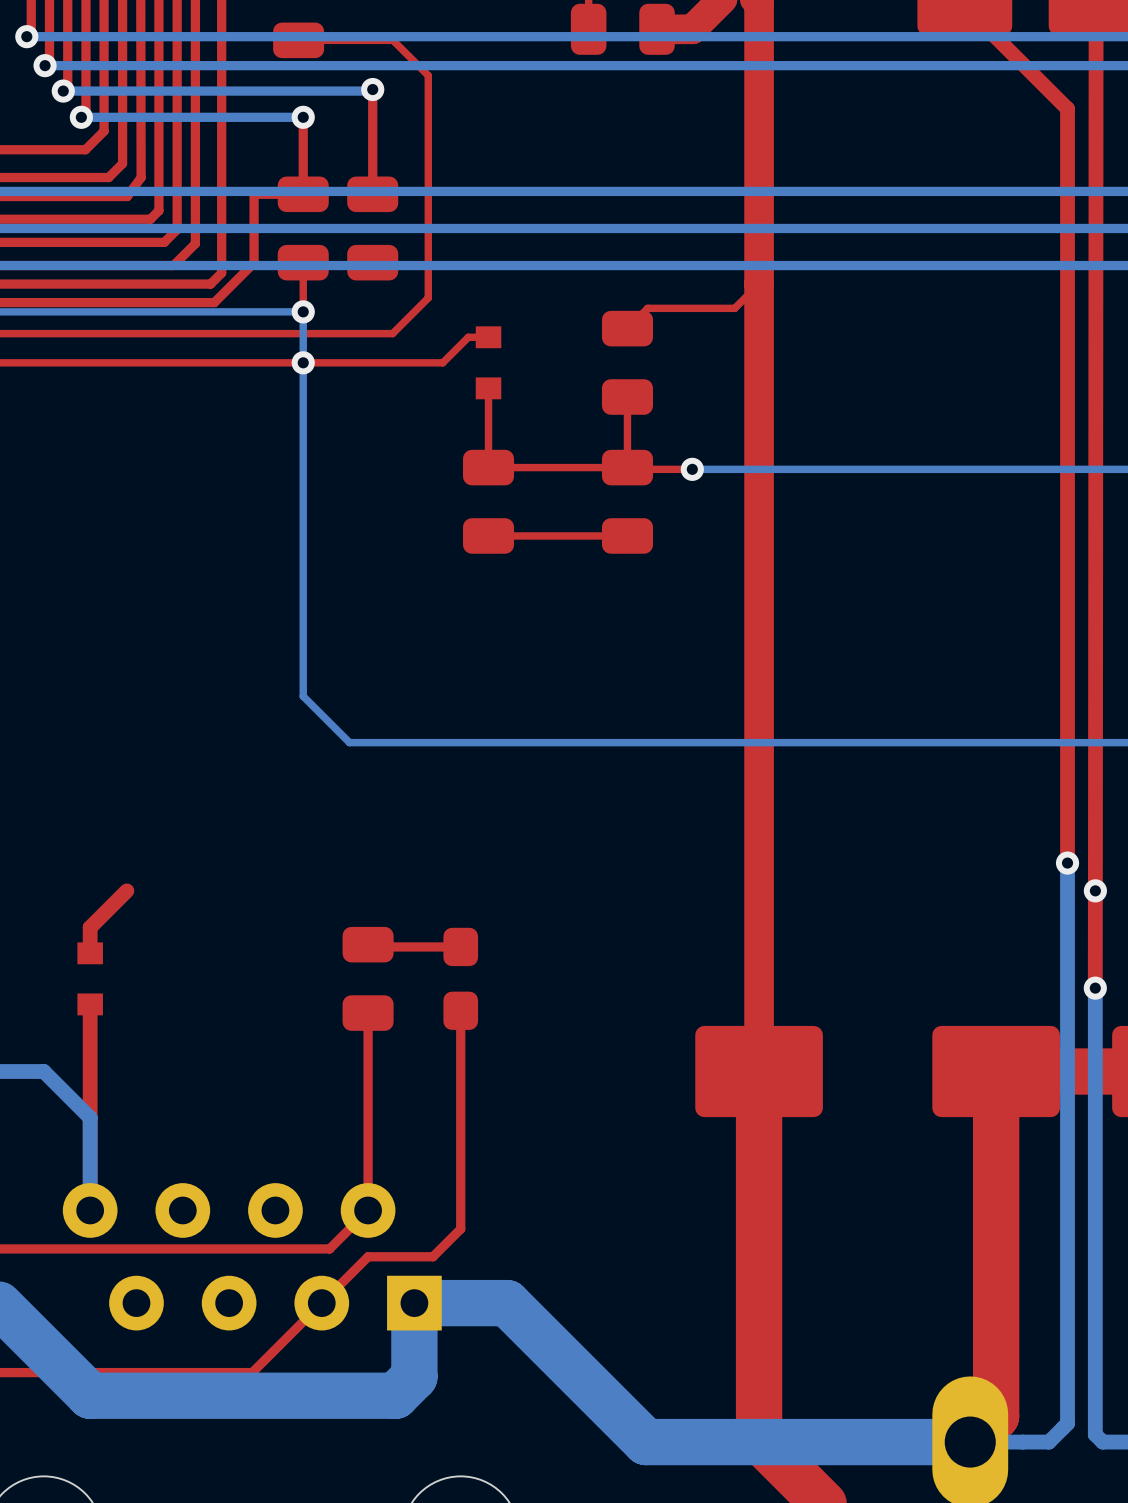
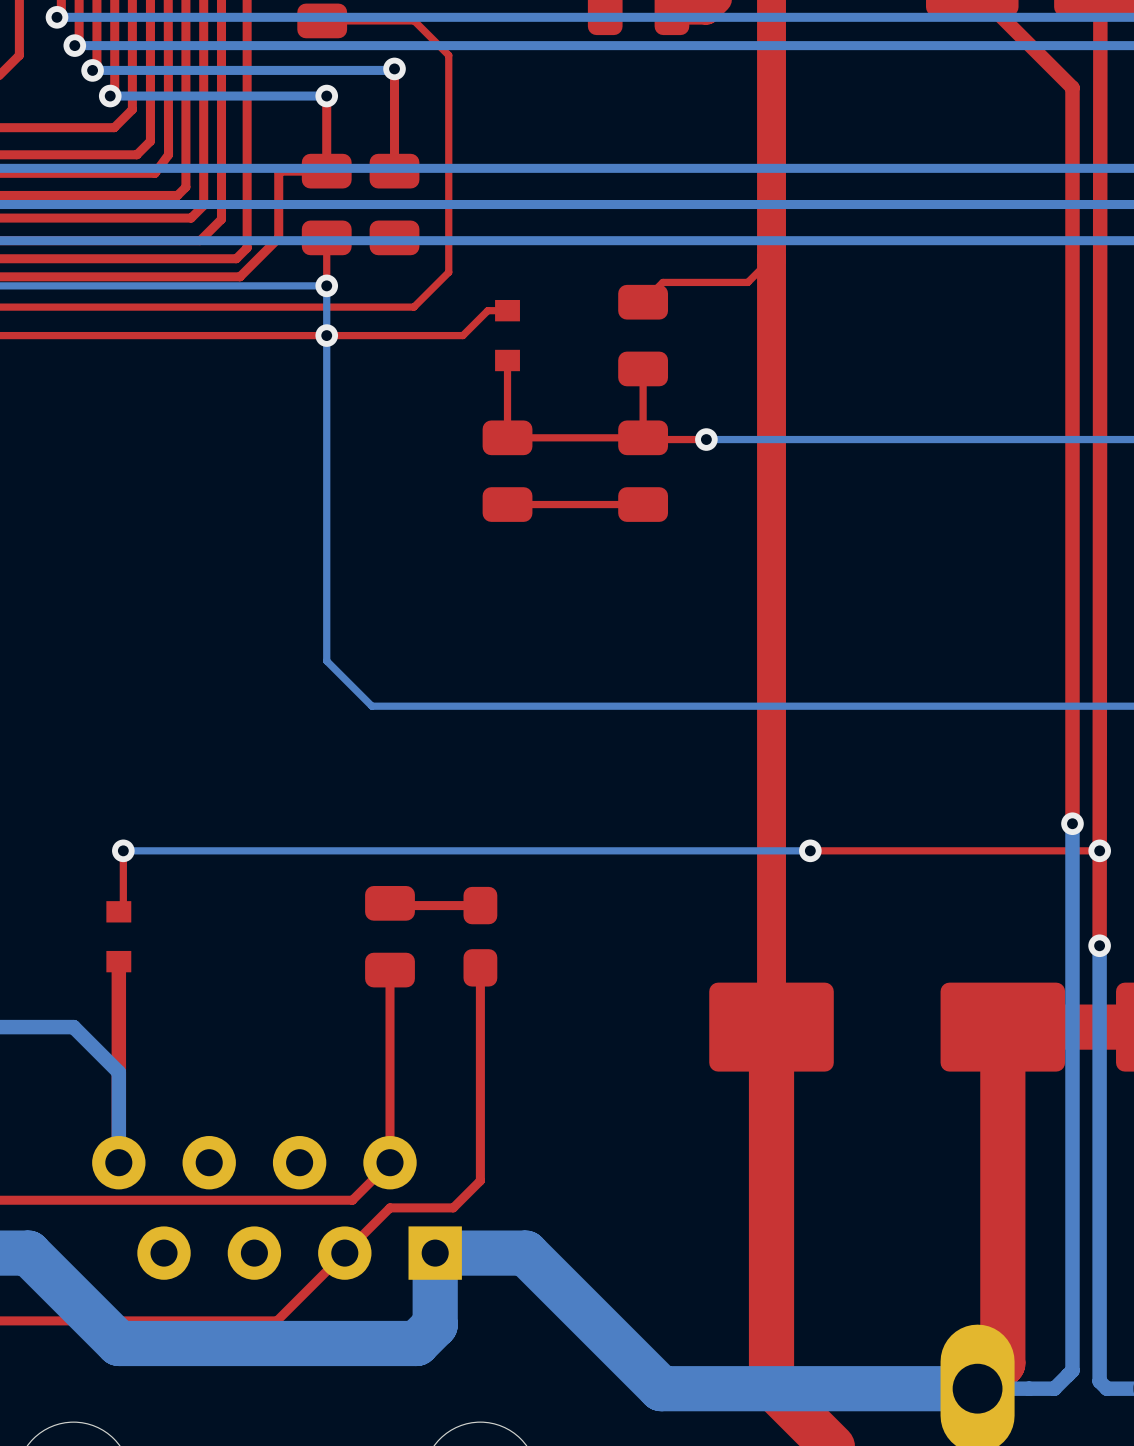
via: none -> (123, 850)
top track: (126, 890) (90, 927) (90, 953) -> (123, 850) (123, 907) (118, 911)
bottom track: none -> (810, 850) (123, 850)
via: none -> (810, 850)
top track: none -> (1099, 850) (810, 850)

